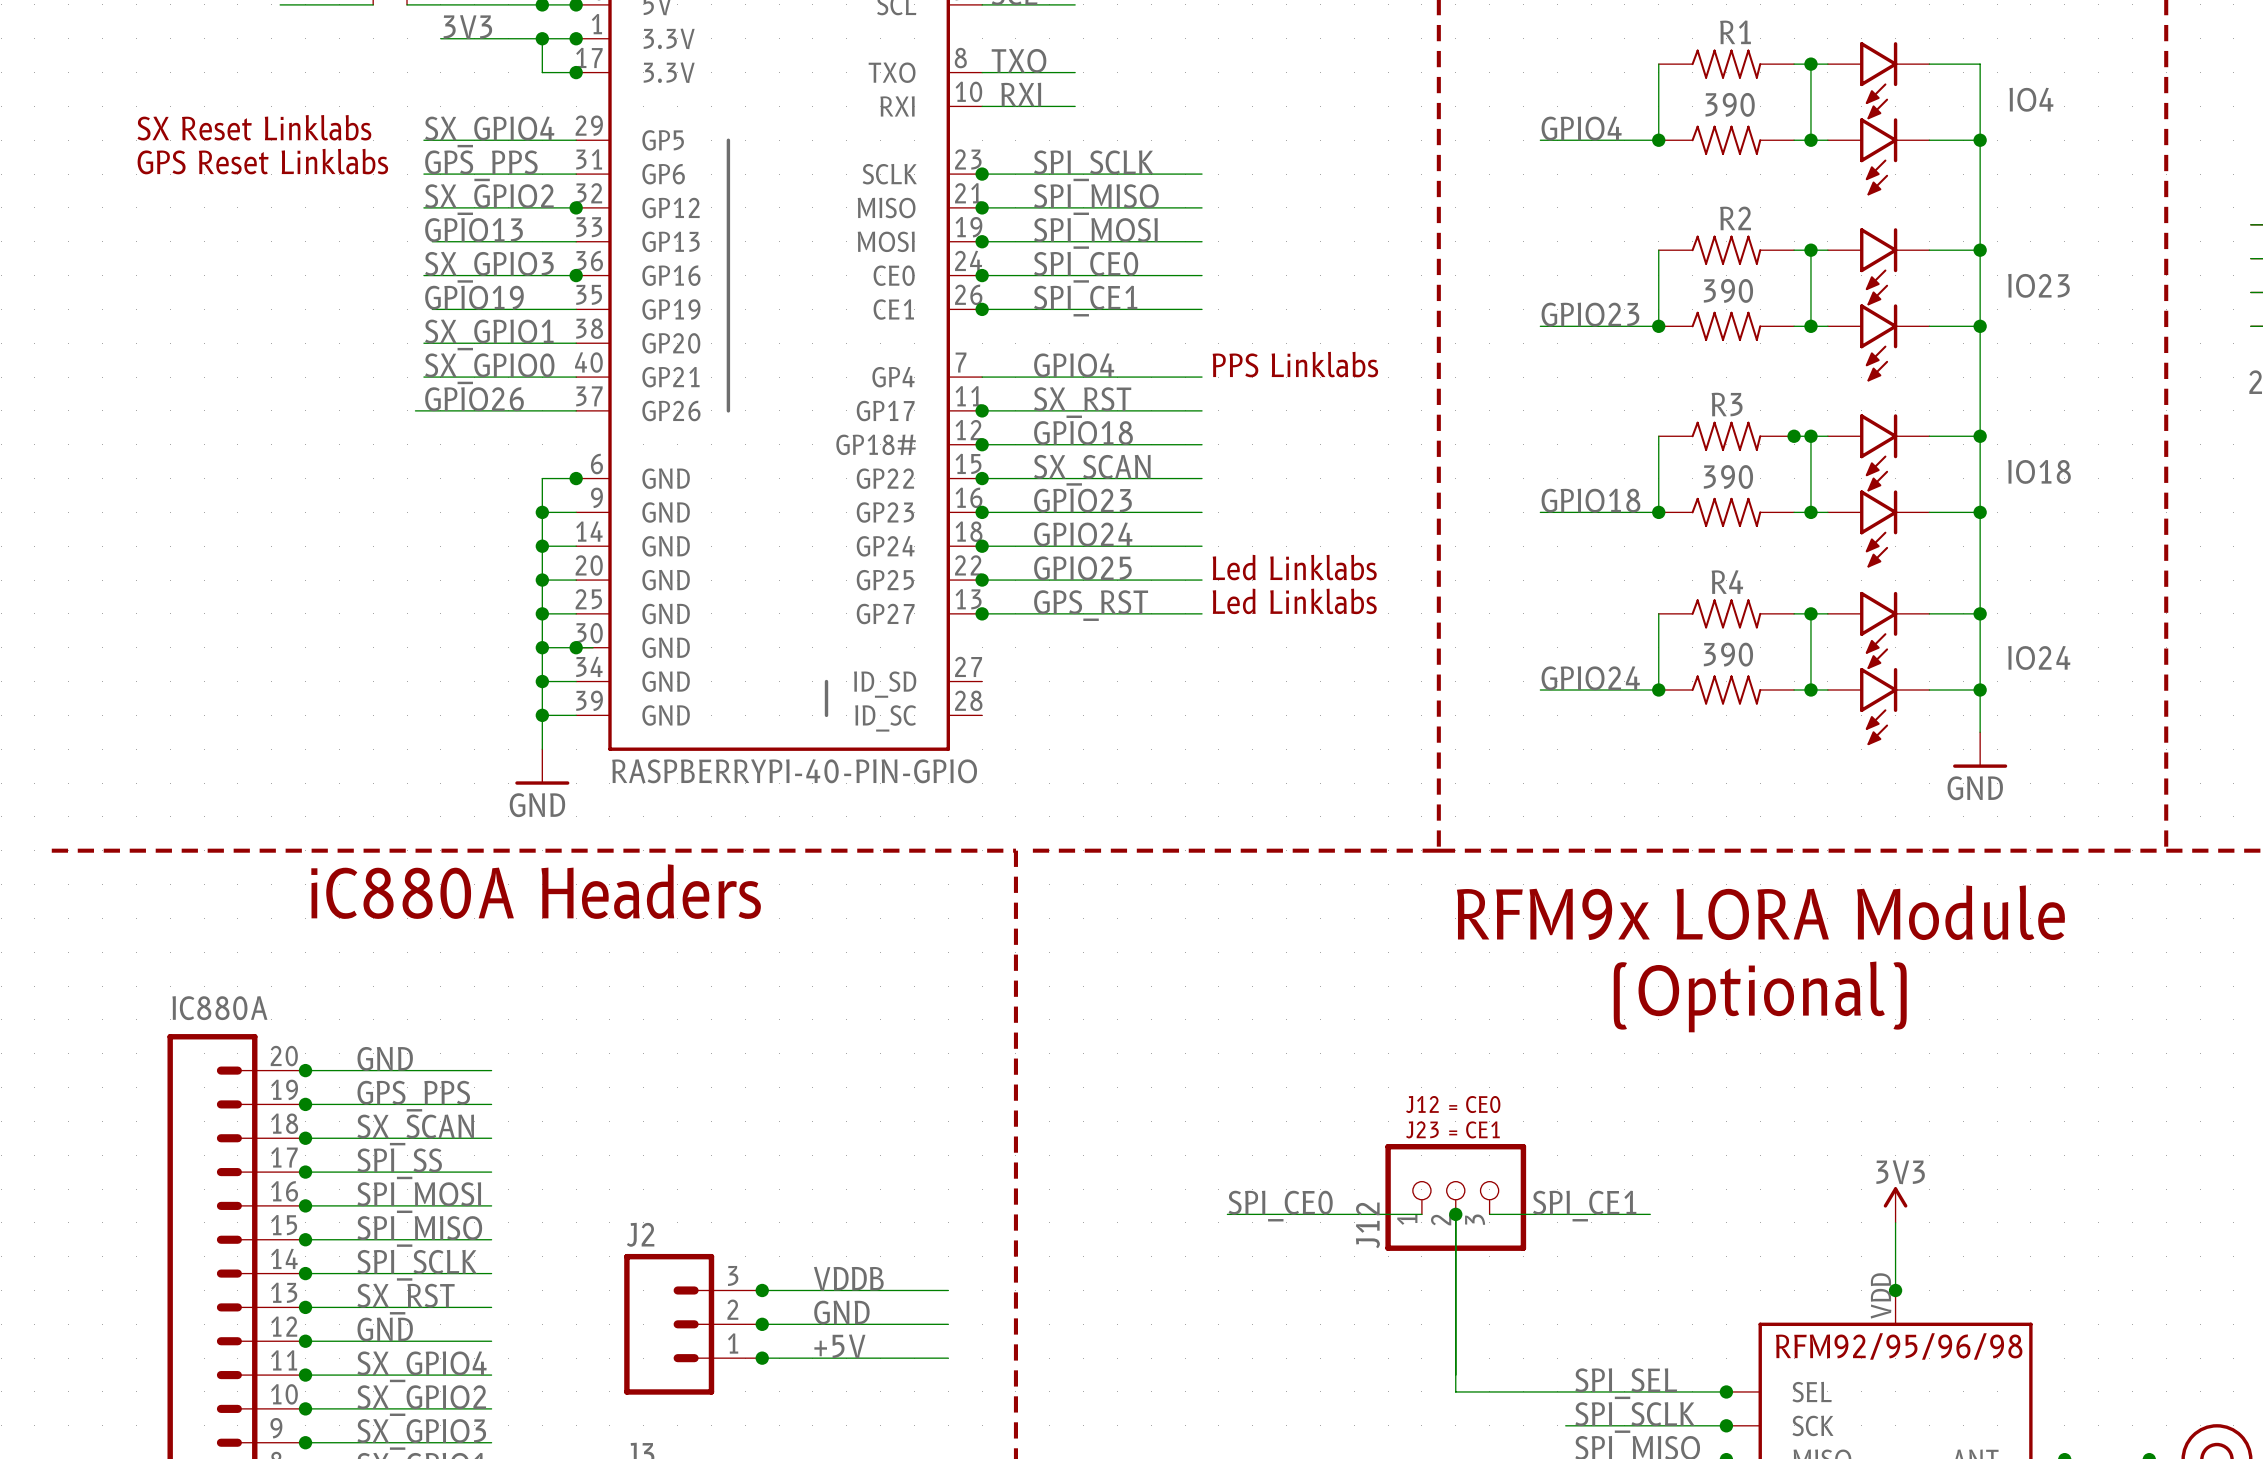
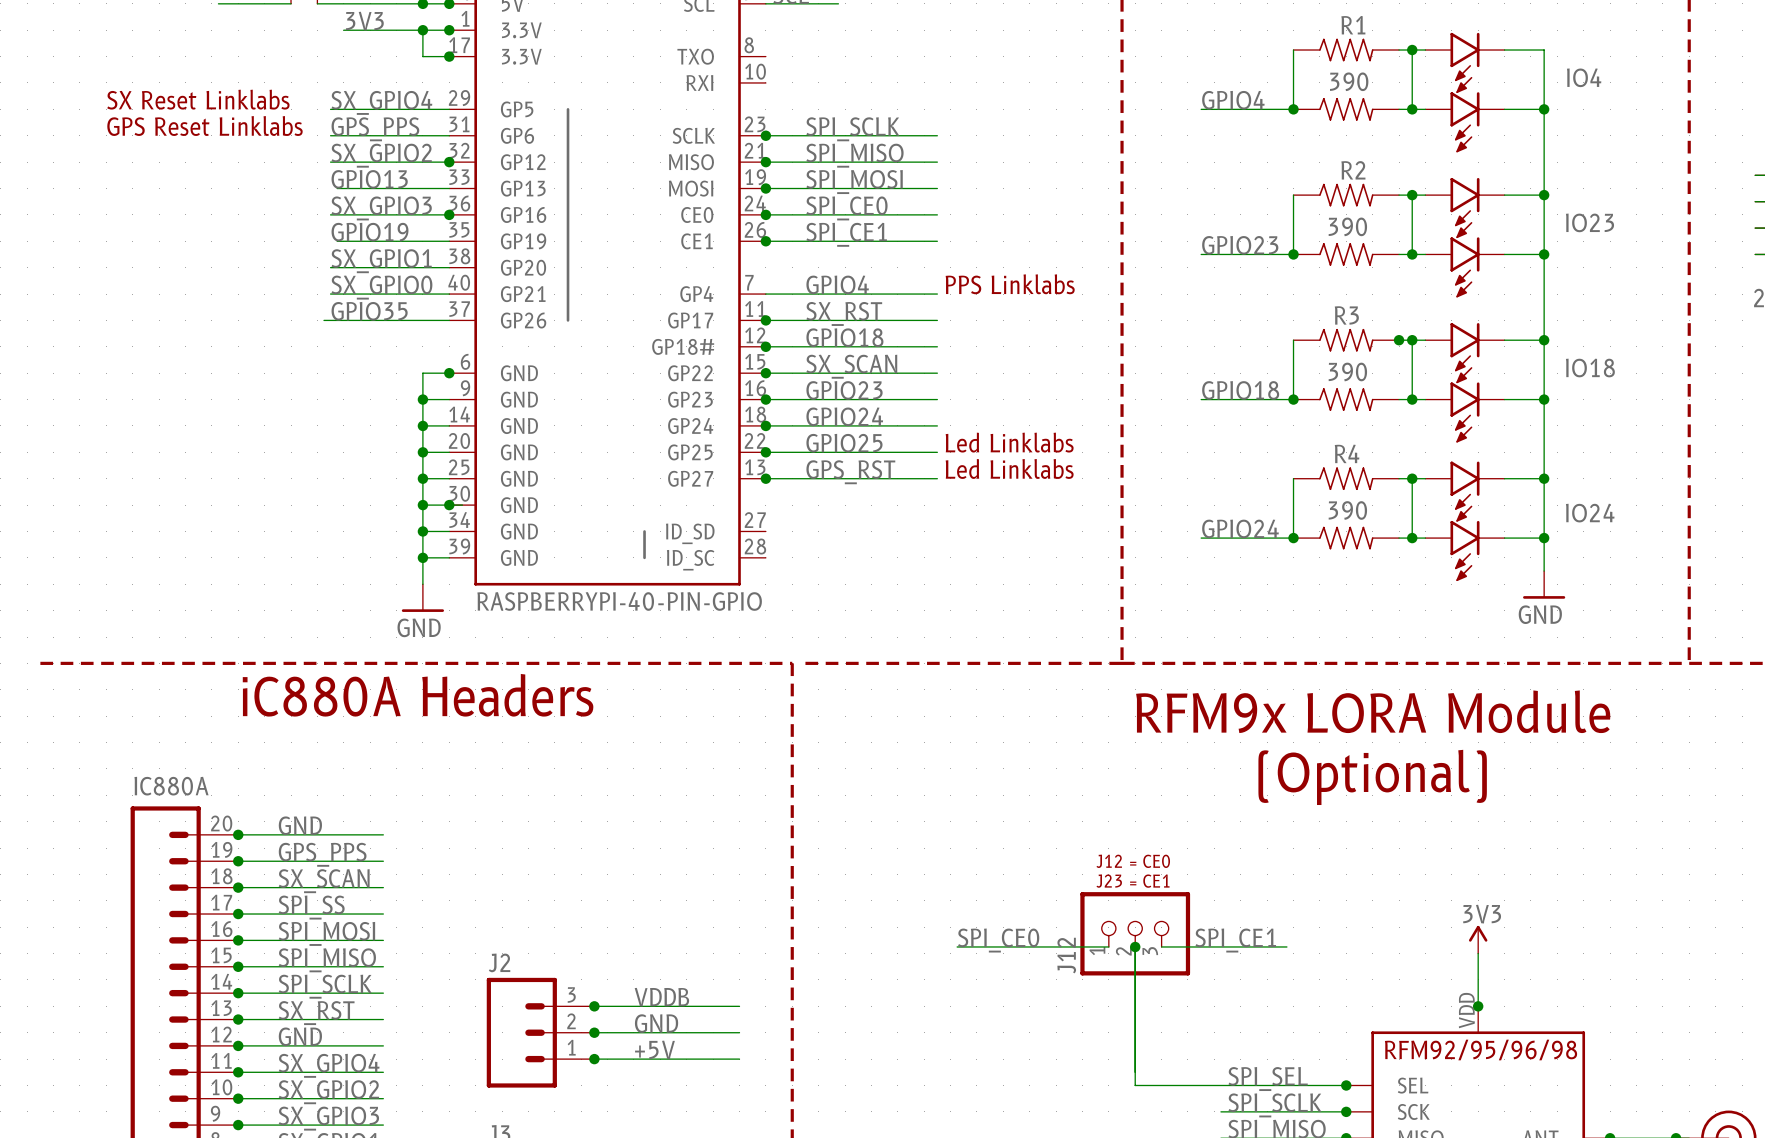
label: TXO (1019, 60) -> none
wire: (982, 72) (1075, 72) -> none
label: RXI (1021, 94) -> none
wire: (982, 106) (1075, 106) -> none
label: GPIO26 (474, 399) -> GPIO35 (369, 311)

